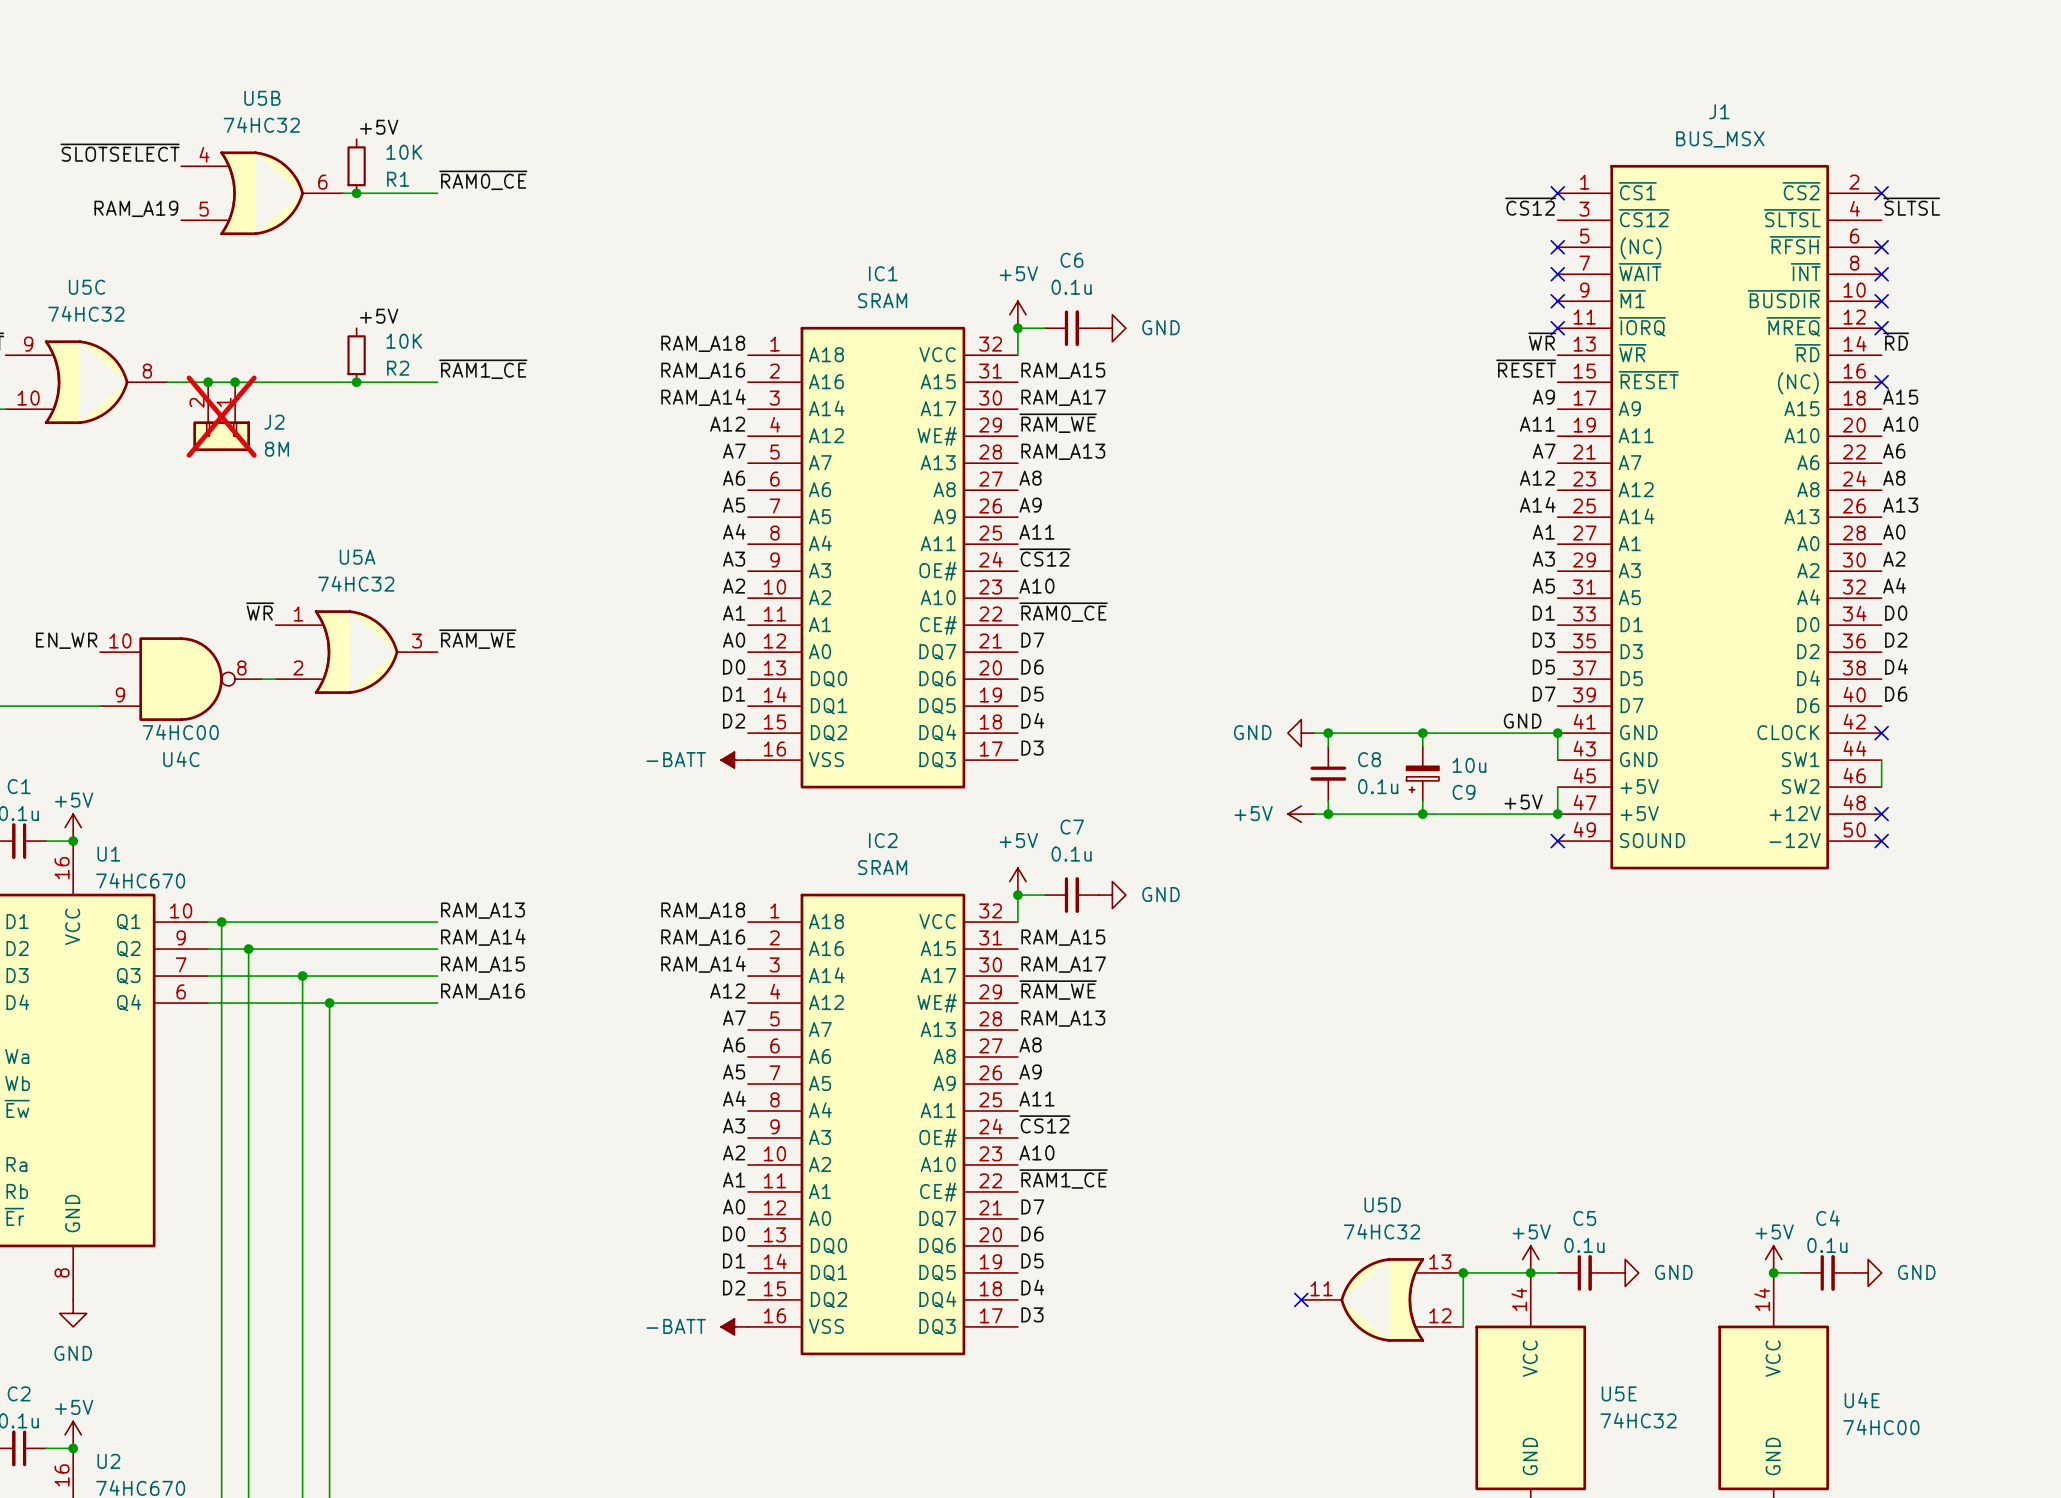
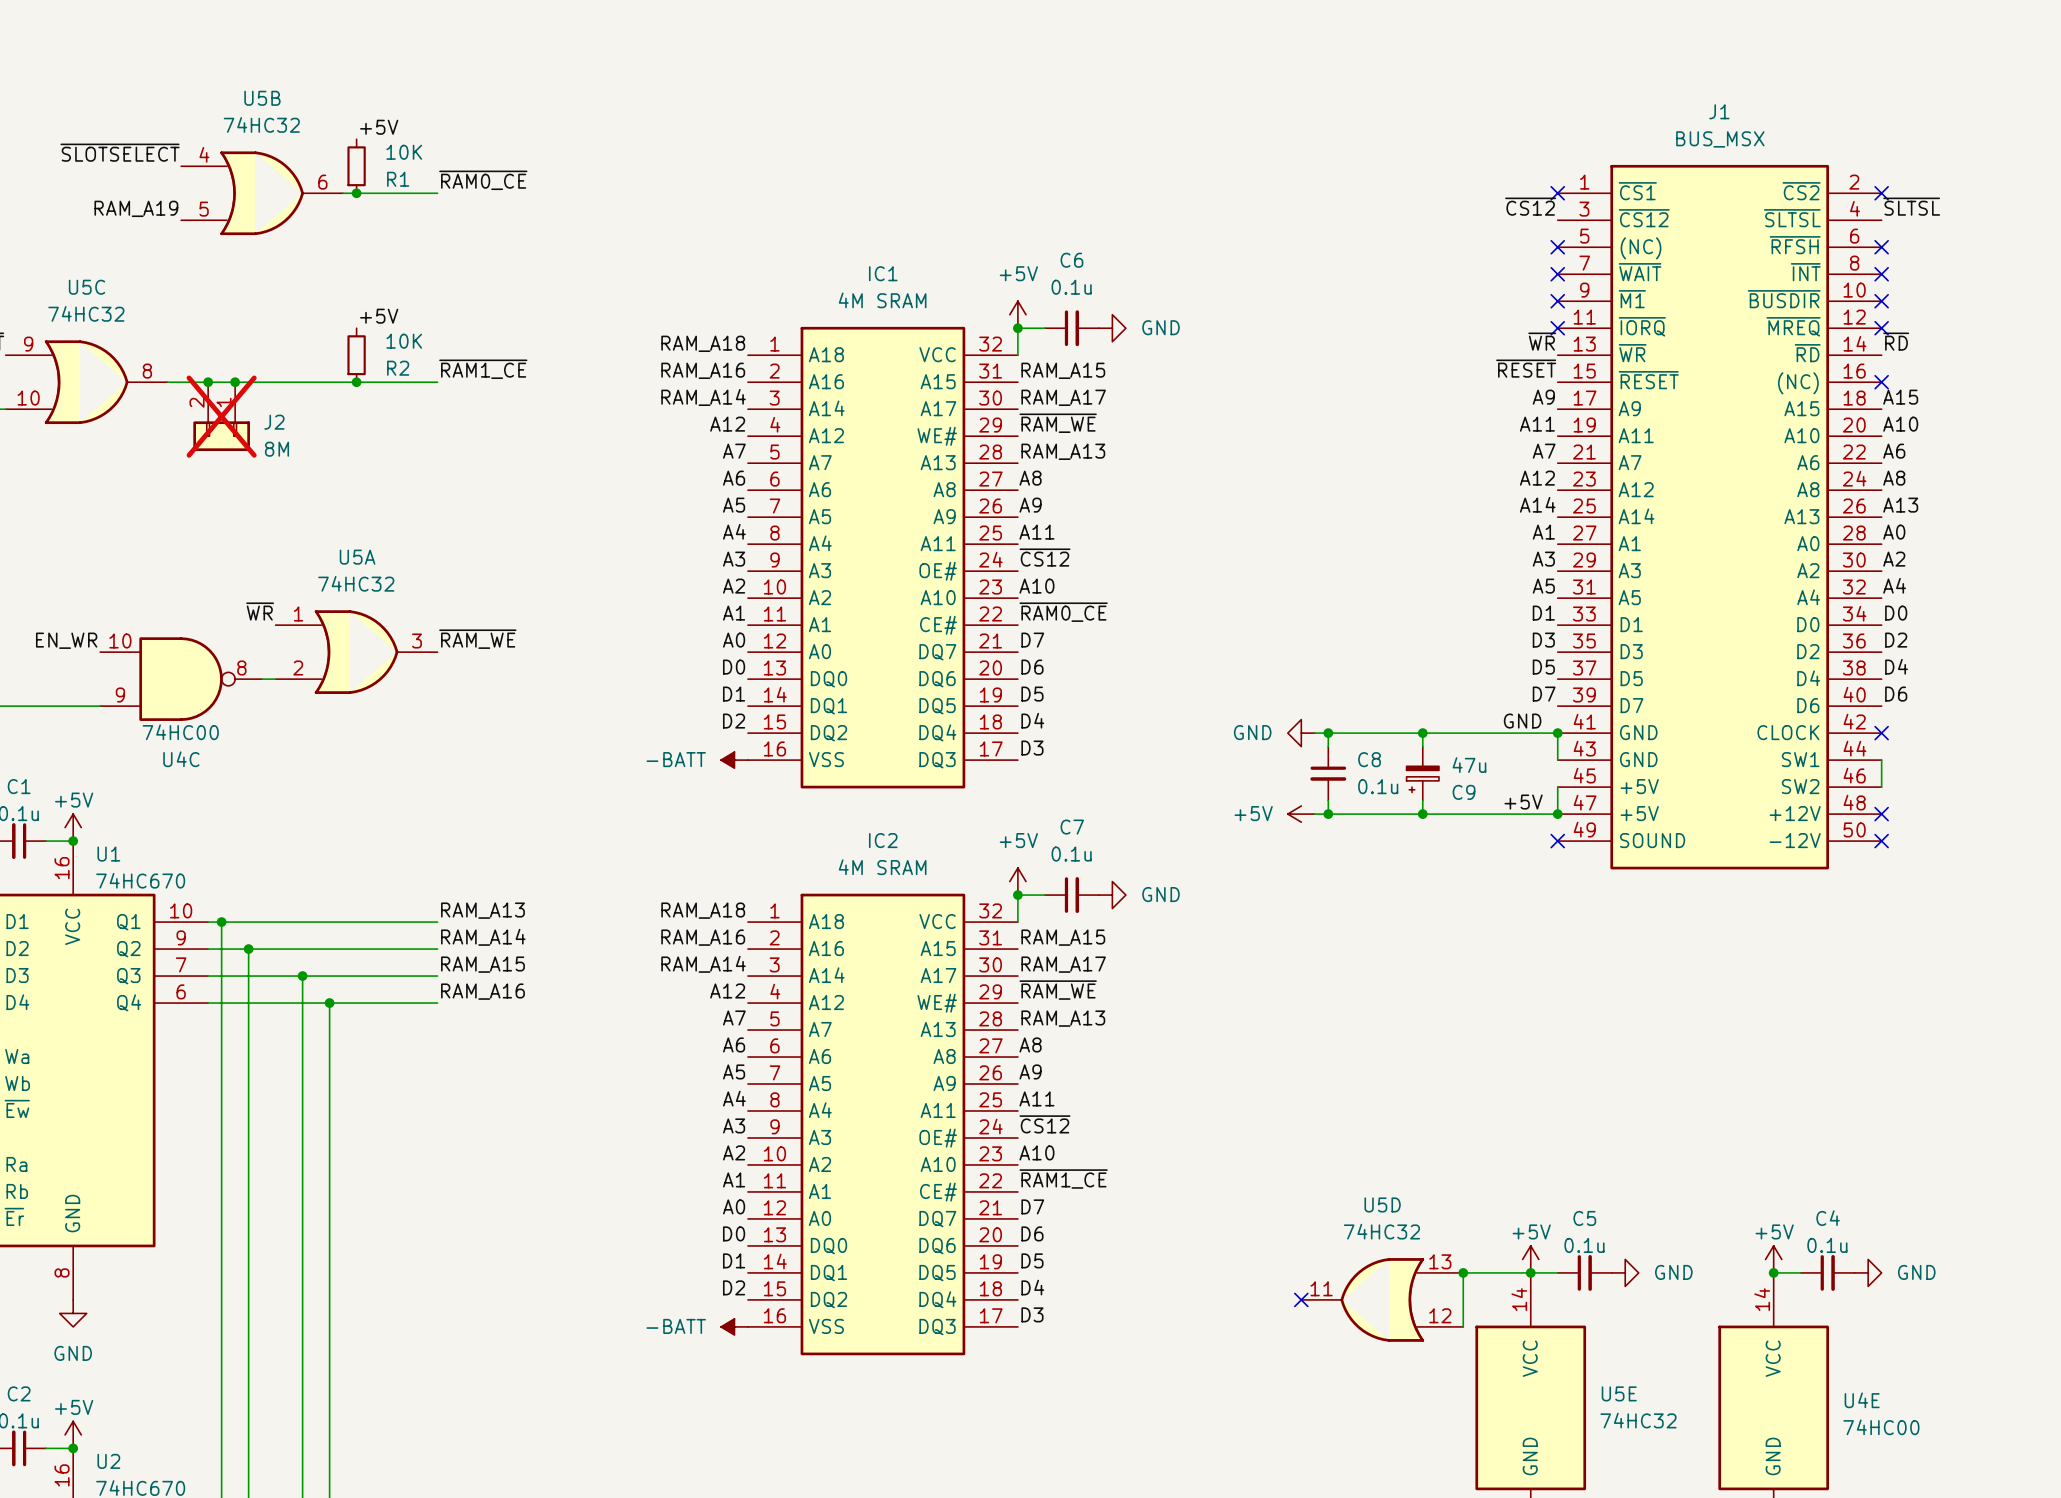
IC1 value: SRAM (882, 300) -> 4M SRAM (882, 300)
C9 value: 10u (1469, 765) -> 47u (1469, 765)
IC2 value: SRAM (882, 867) -> 4M SRAM (882, 867)

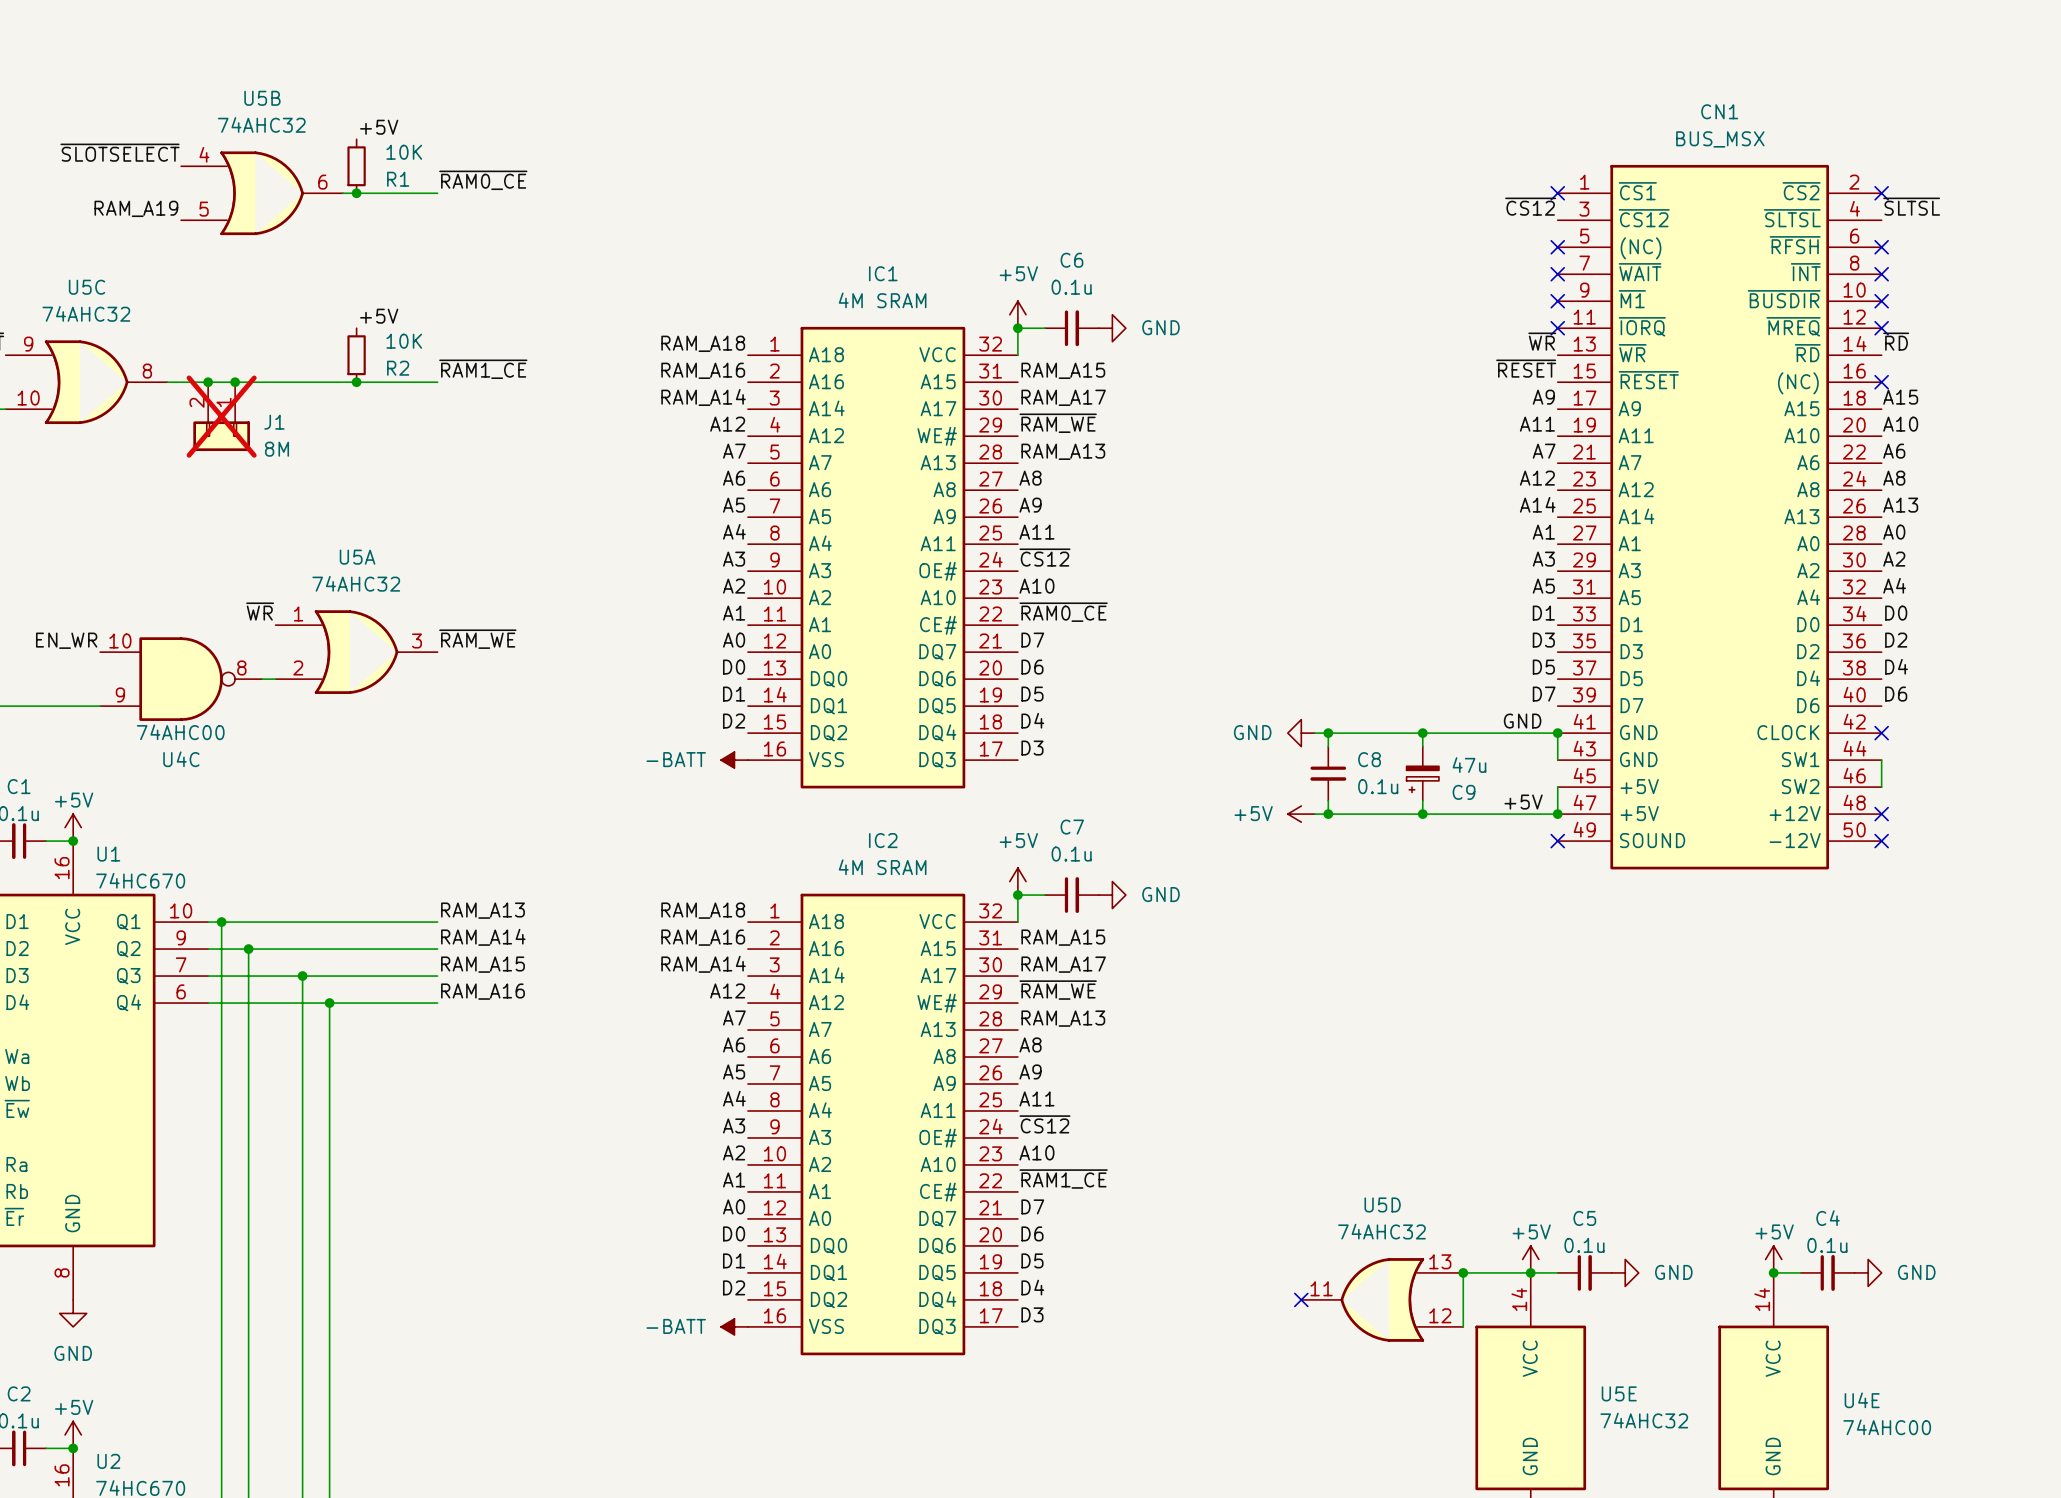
J1 name: J1 (1719, 111) -> CN1 (1719, 111)
U5B value: 74HC32 (261, 124) -> 74AHC32 (261, 124)
U5C value: 74HC32 (86, 313) -> 74AHC32 (86, 313)
J2 name: J2 (274, 422) -> J1 (274, 422)
U5A value: 74HC32 (356, 583) -> 74AHC32 (356, 583)
U4C value: 74HC00 (180, 732) -> 74AHC00 (180, 732)
U5D value: 74HC32 (1381, 1231) -> 74AHC32 (1381, 1231)
U5E value: 74HC32 (1638, 1420) -> 74AHC32 (1644, 1420)
U4E value: 74HC00 (1881, 1427) -> 74AHC00 (1887, 1427)

